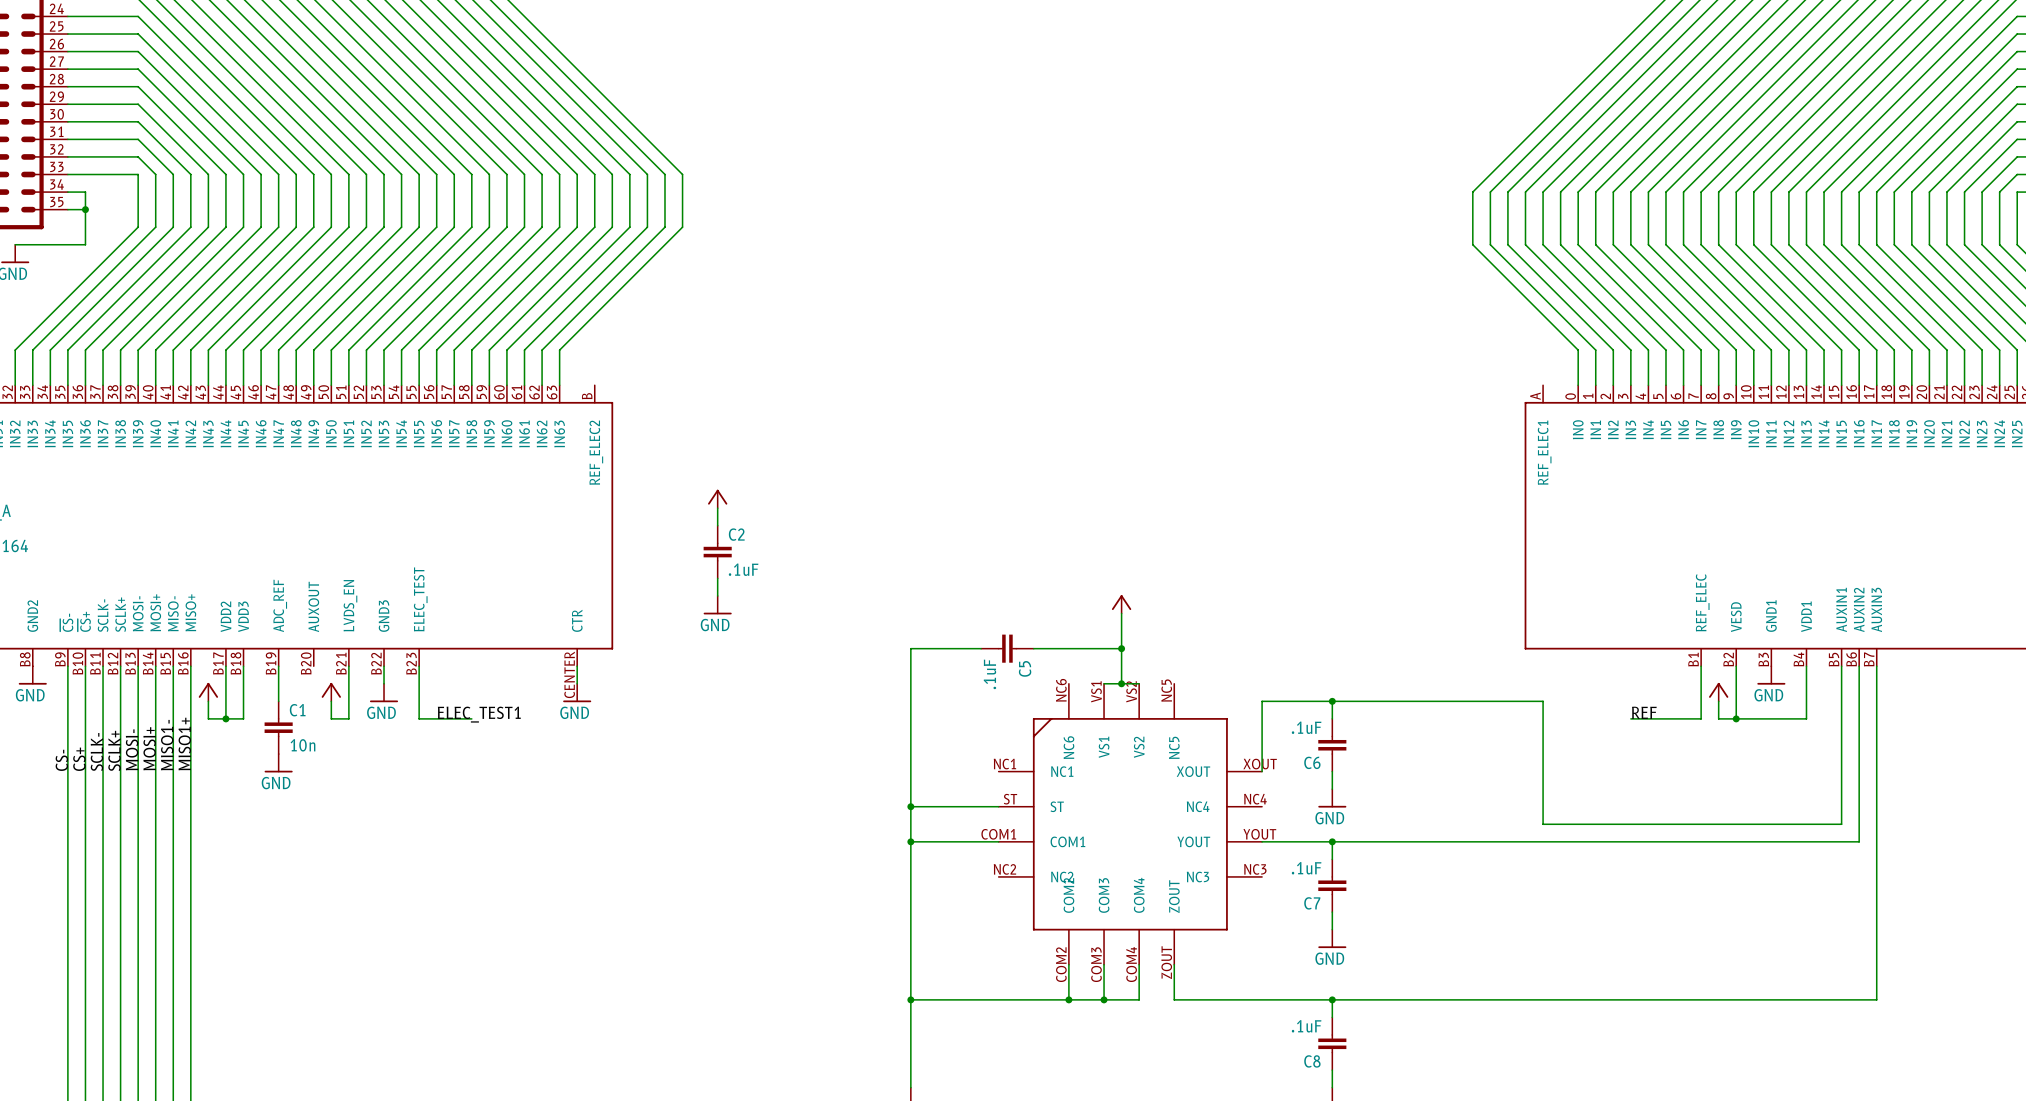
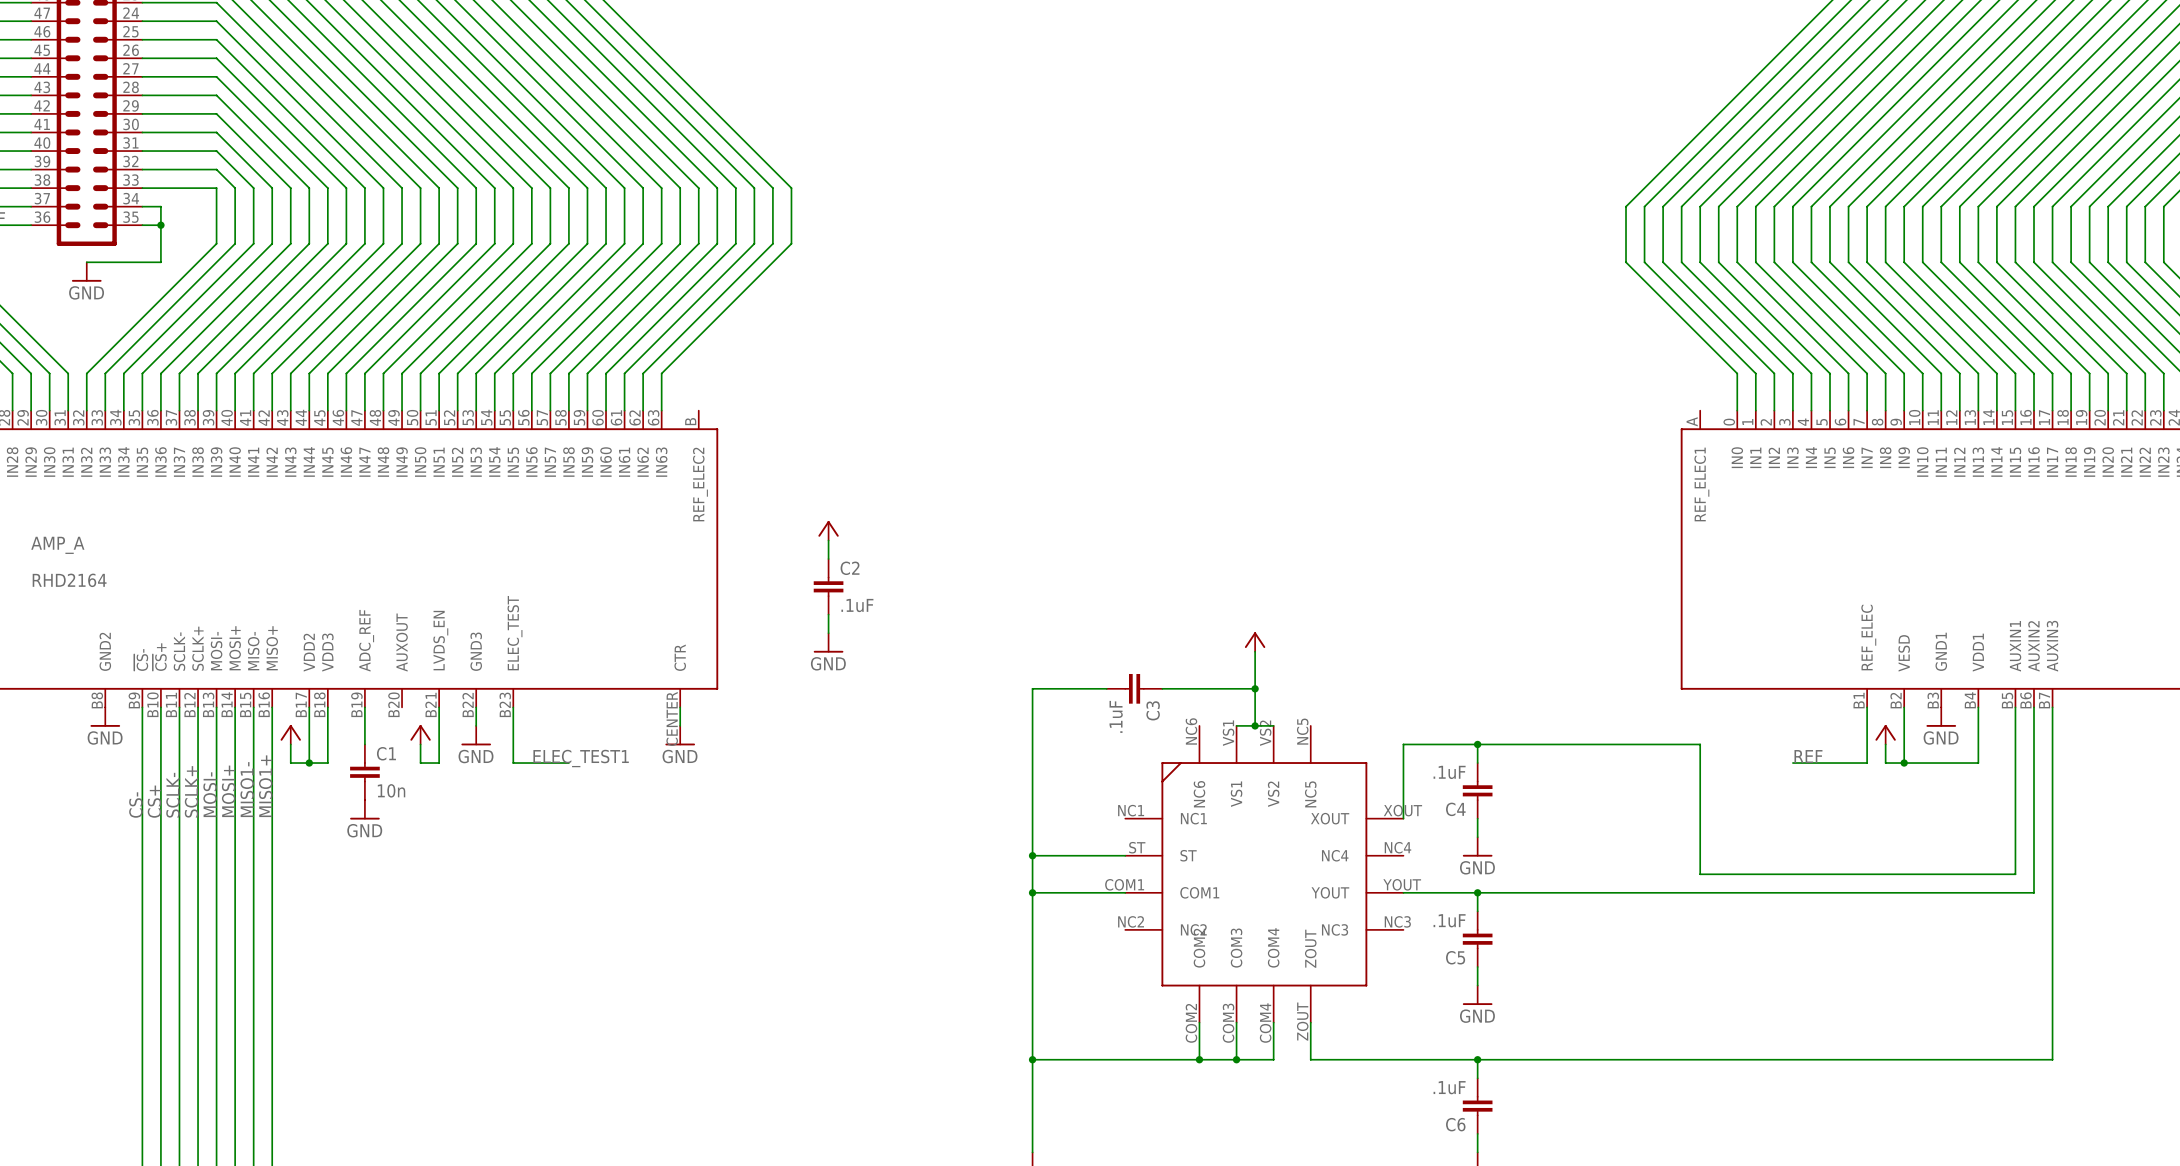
C5 name: C5 (1025, 668) -> C3 (1153, 710)
C6 name: C6 (1312, 762) -> C4 (1455, 809)
C7 name: C7 (1312, 903) -> C5 (1455, 957)
C8 name: C8 (1312, 1061) -> C6 (1455, 1124)

